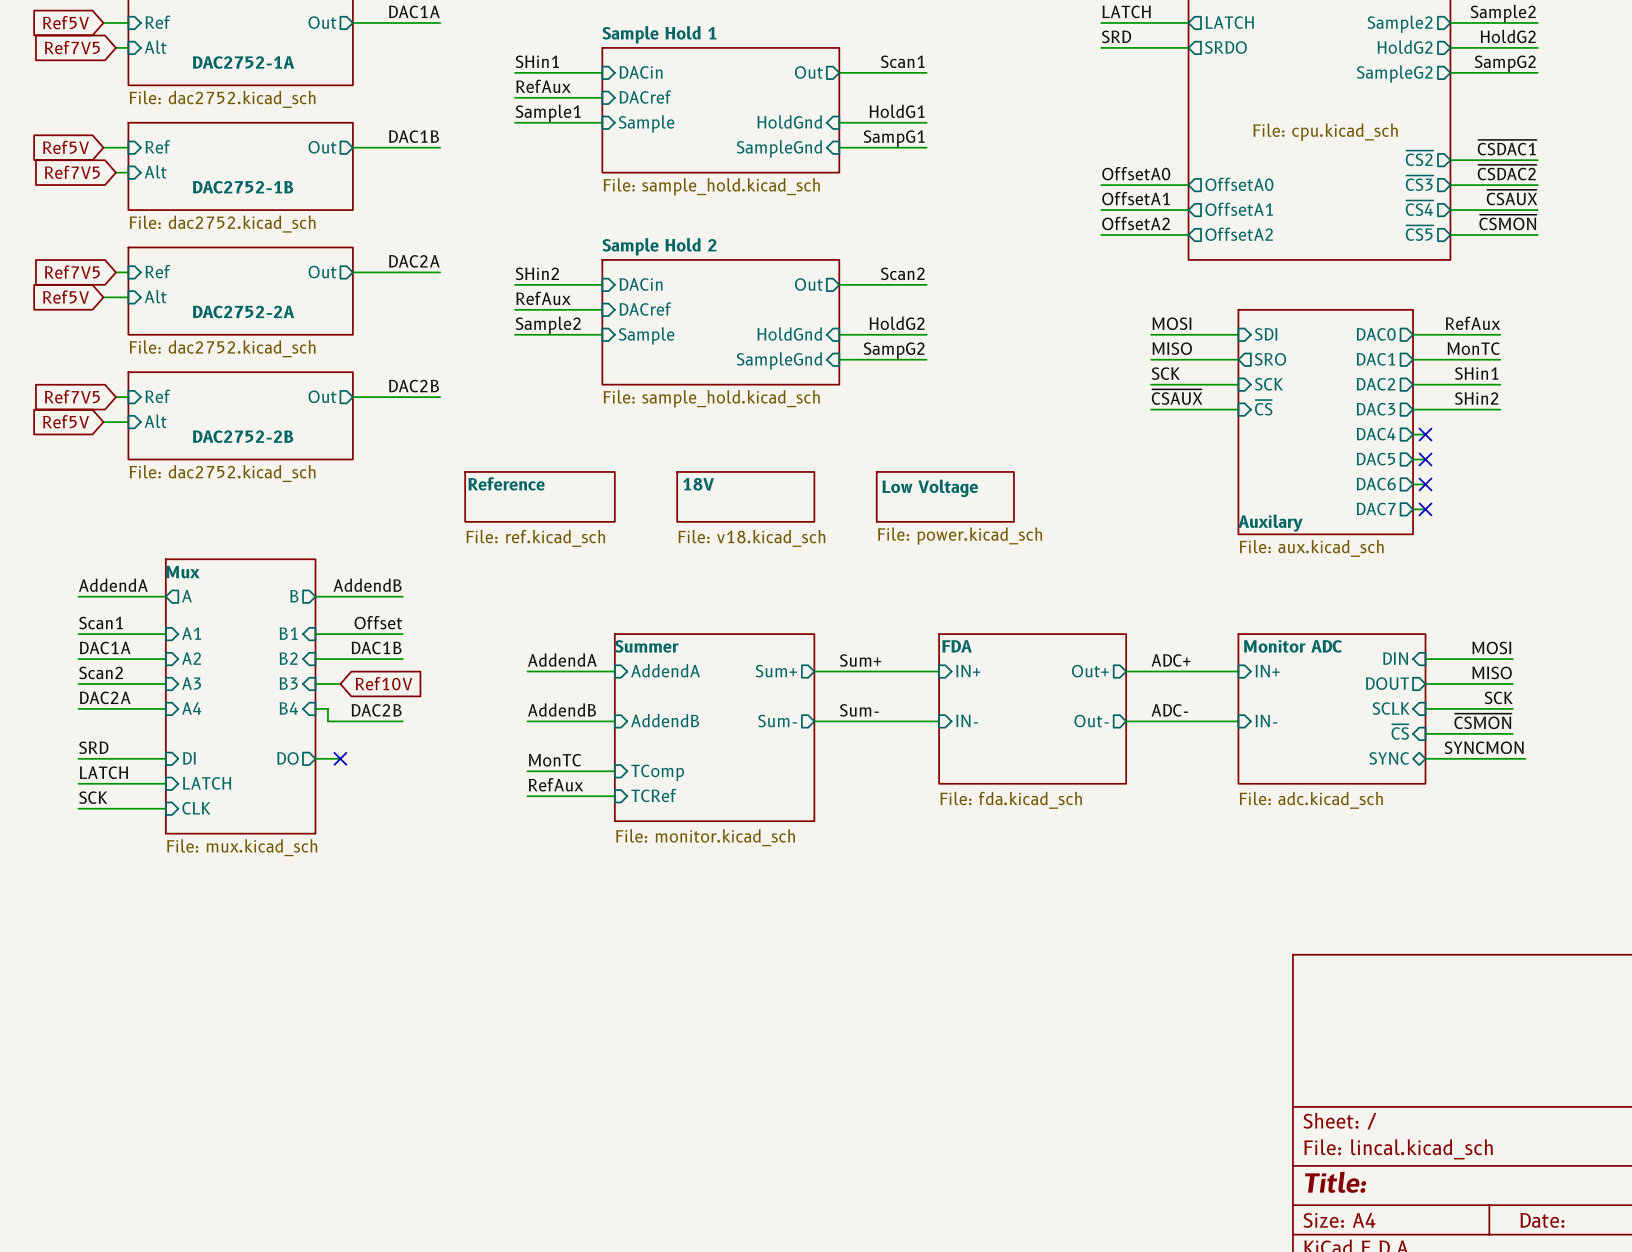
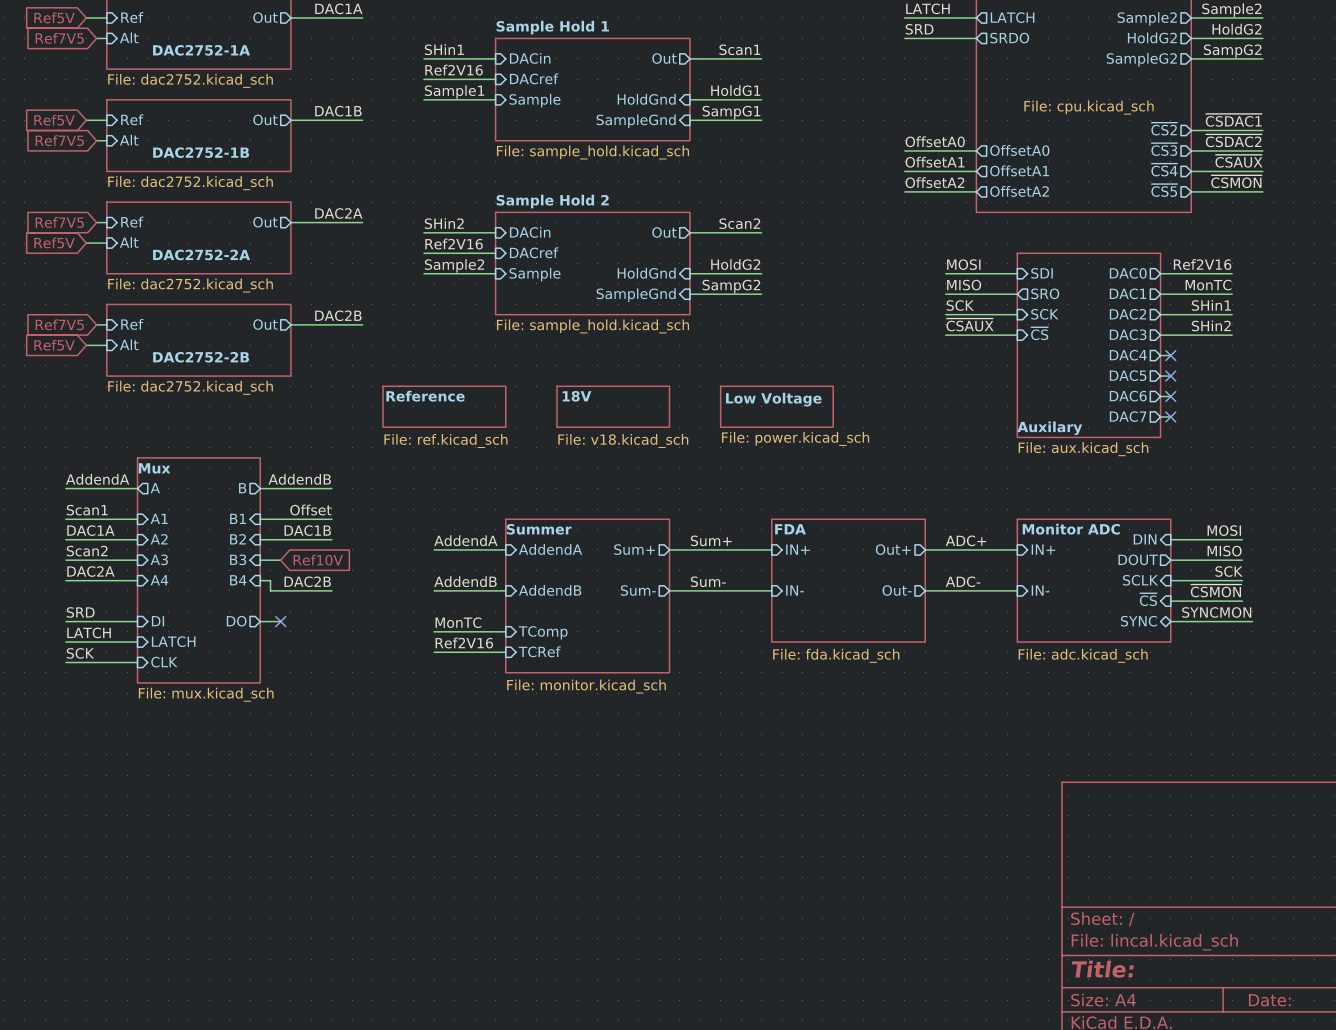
label: RefAux (543, 86) -> Ref2V16 (454, 70)
label: RefAux (543, 298) -> Ref2V16 (454, 244)
label: RefAux (1472, 323) -> Ref2V16 (1202, 264)
label: RefAux (555, 784) -> Ref2V16 (464, 643)

